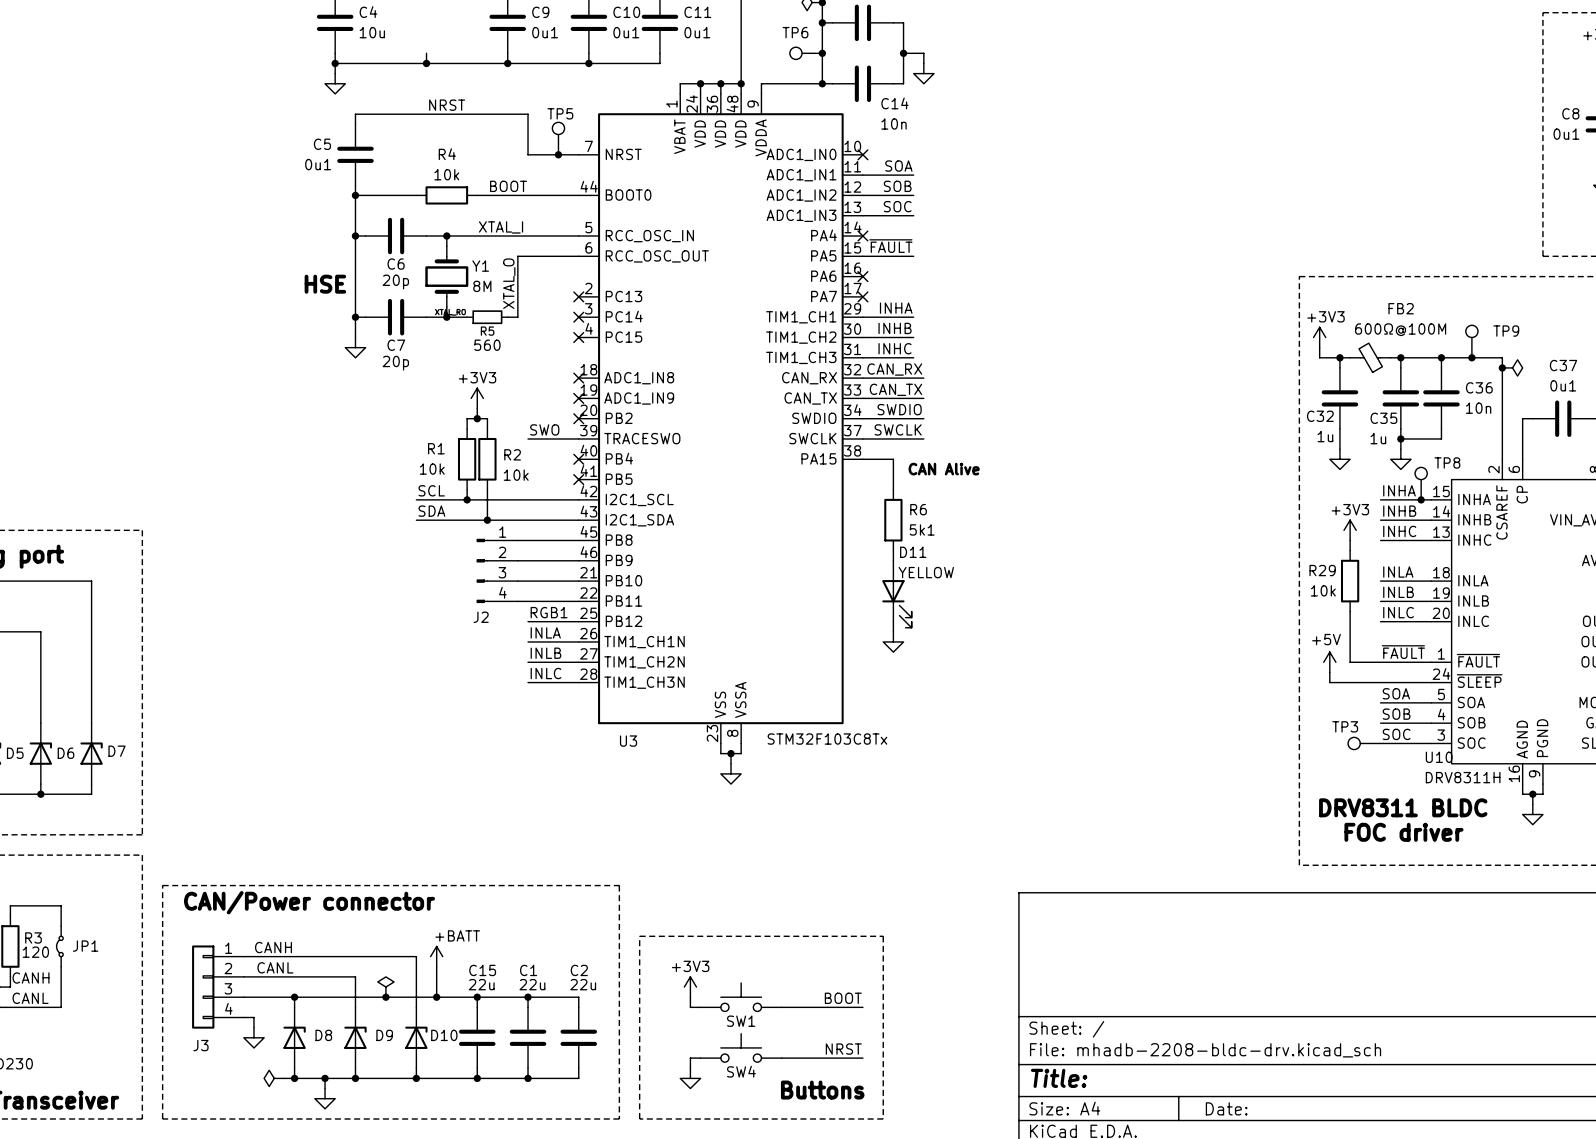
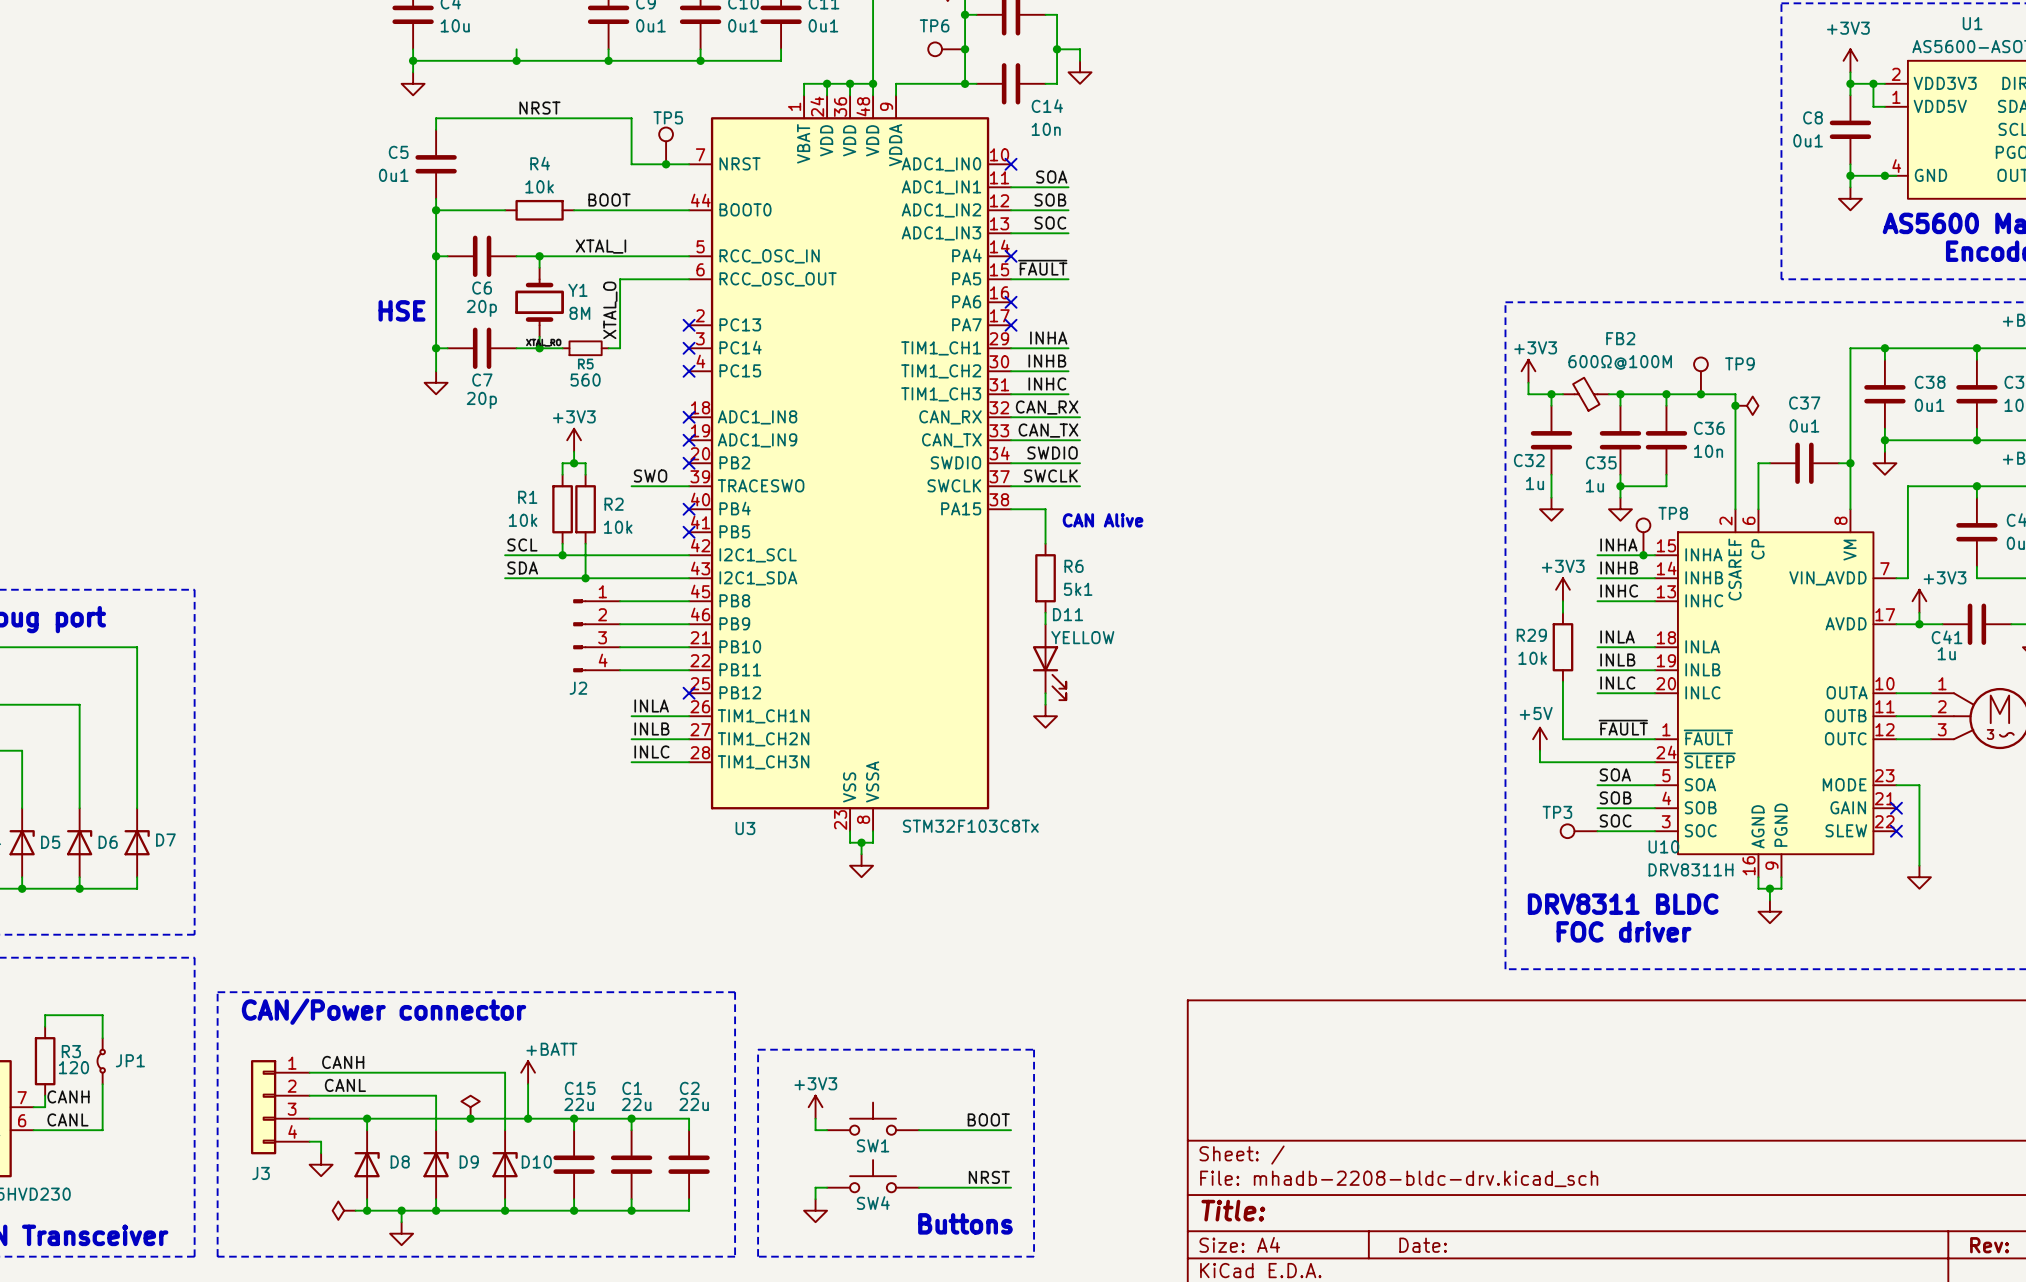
label: RGB1 (549, 612) -> none
wire: (528, 621) (578, 621) -> none
no-connect mark: none -> (689, 693)

